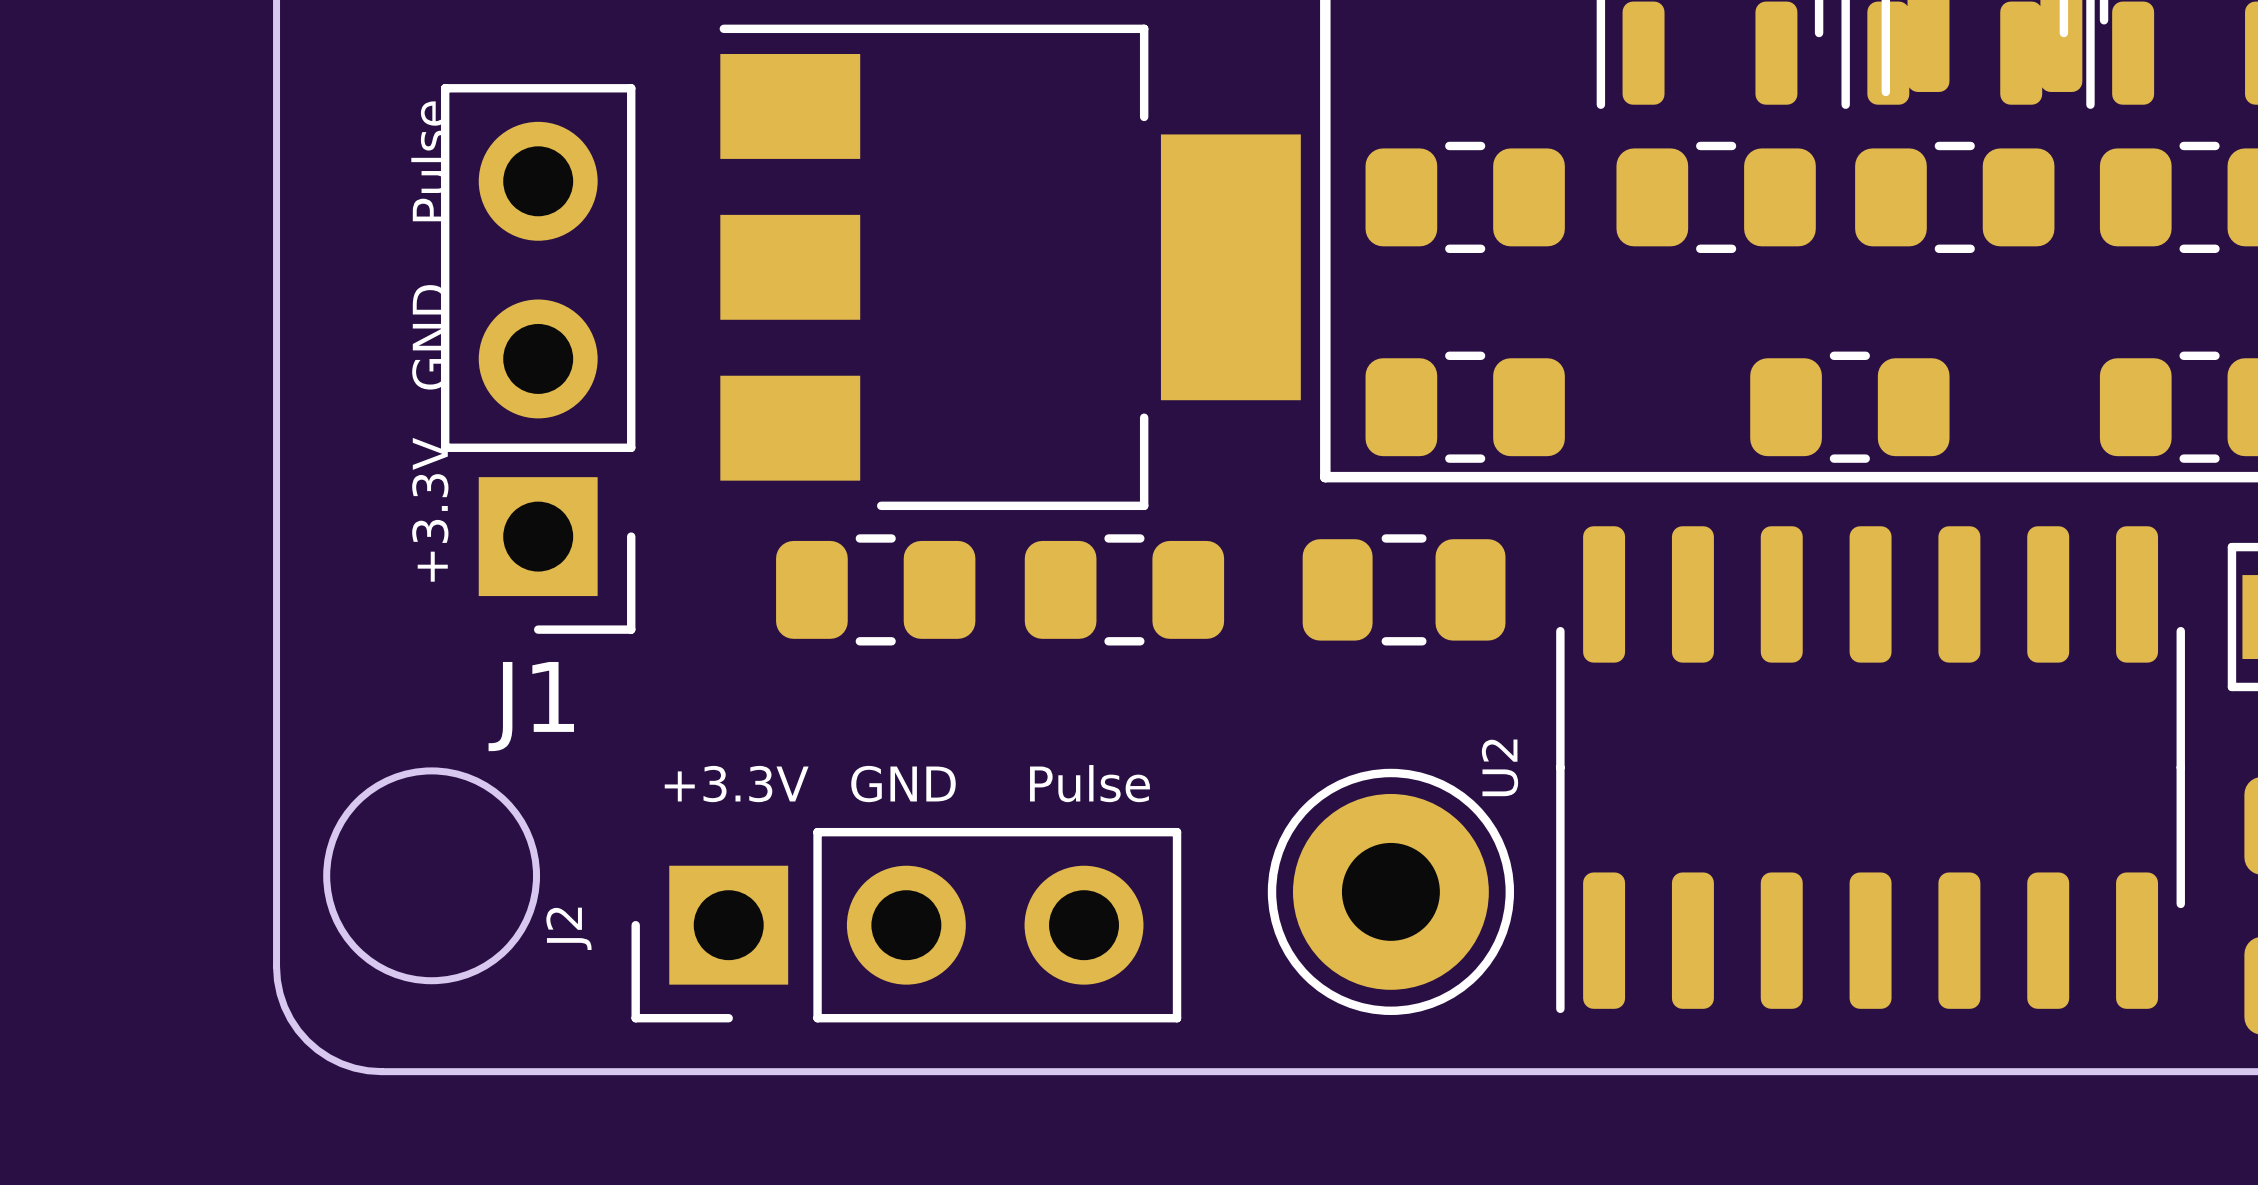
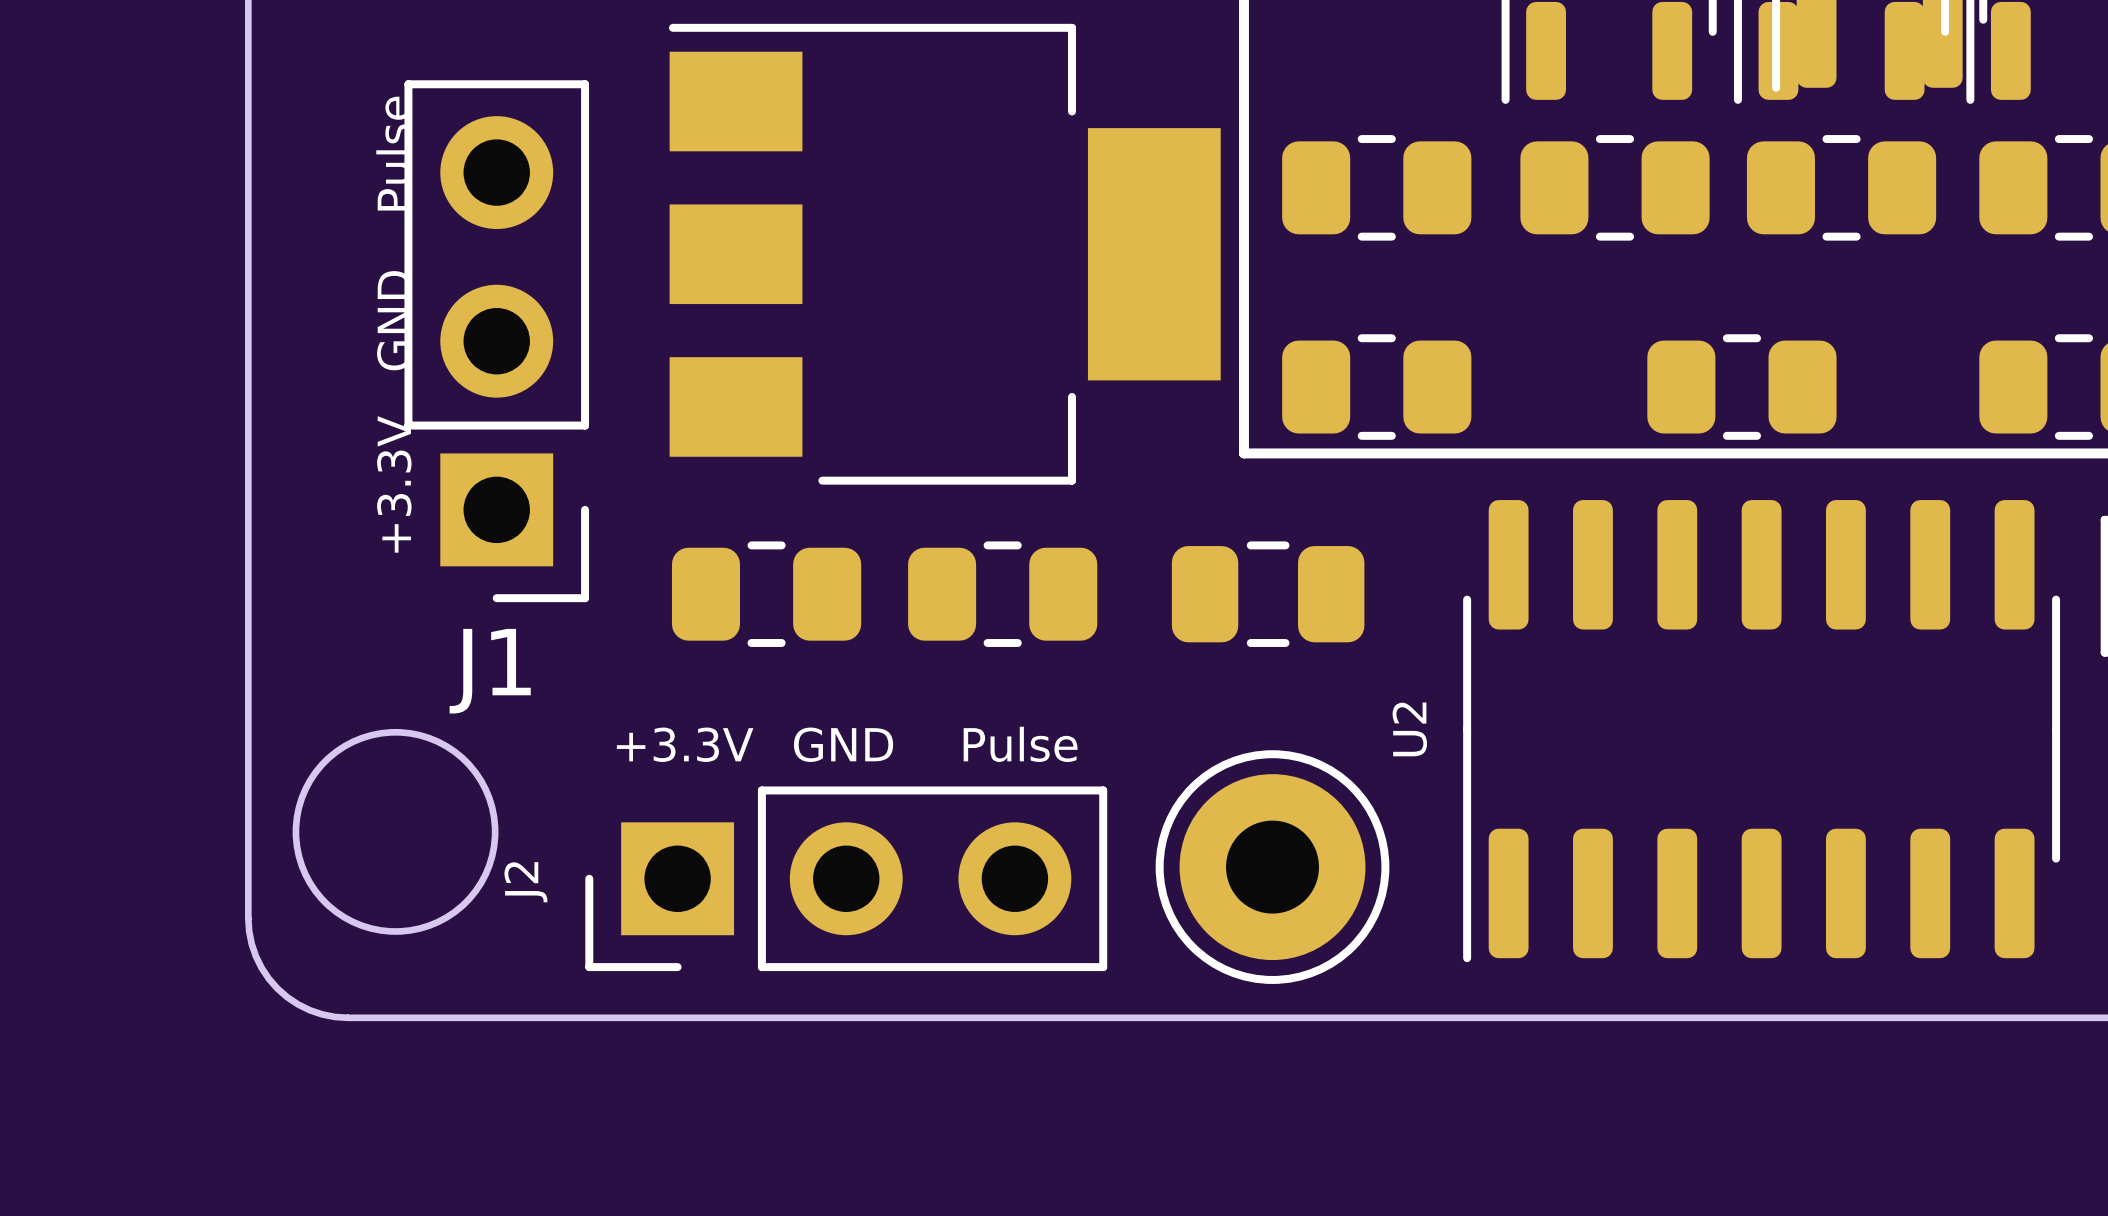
part position: (875, 589) -> (766, 594)
part position: (1124, 589) -> (1002, 594)
part position: (1404, 589) -> (1268, 594)
part position: (1390, 891) -> (1272, 867)

